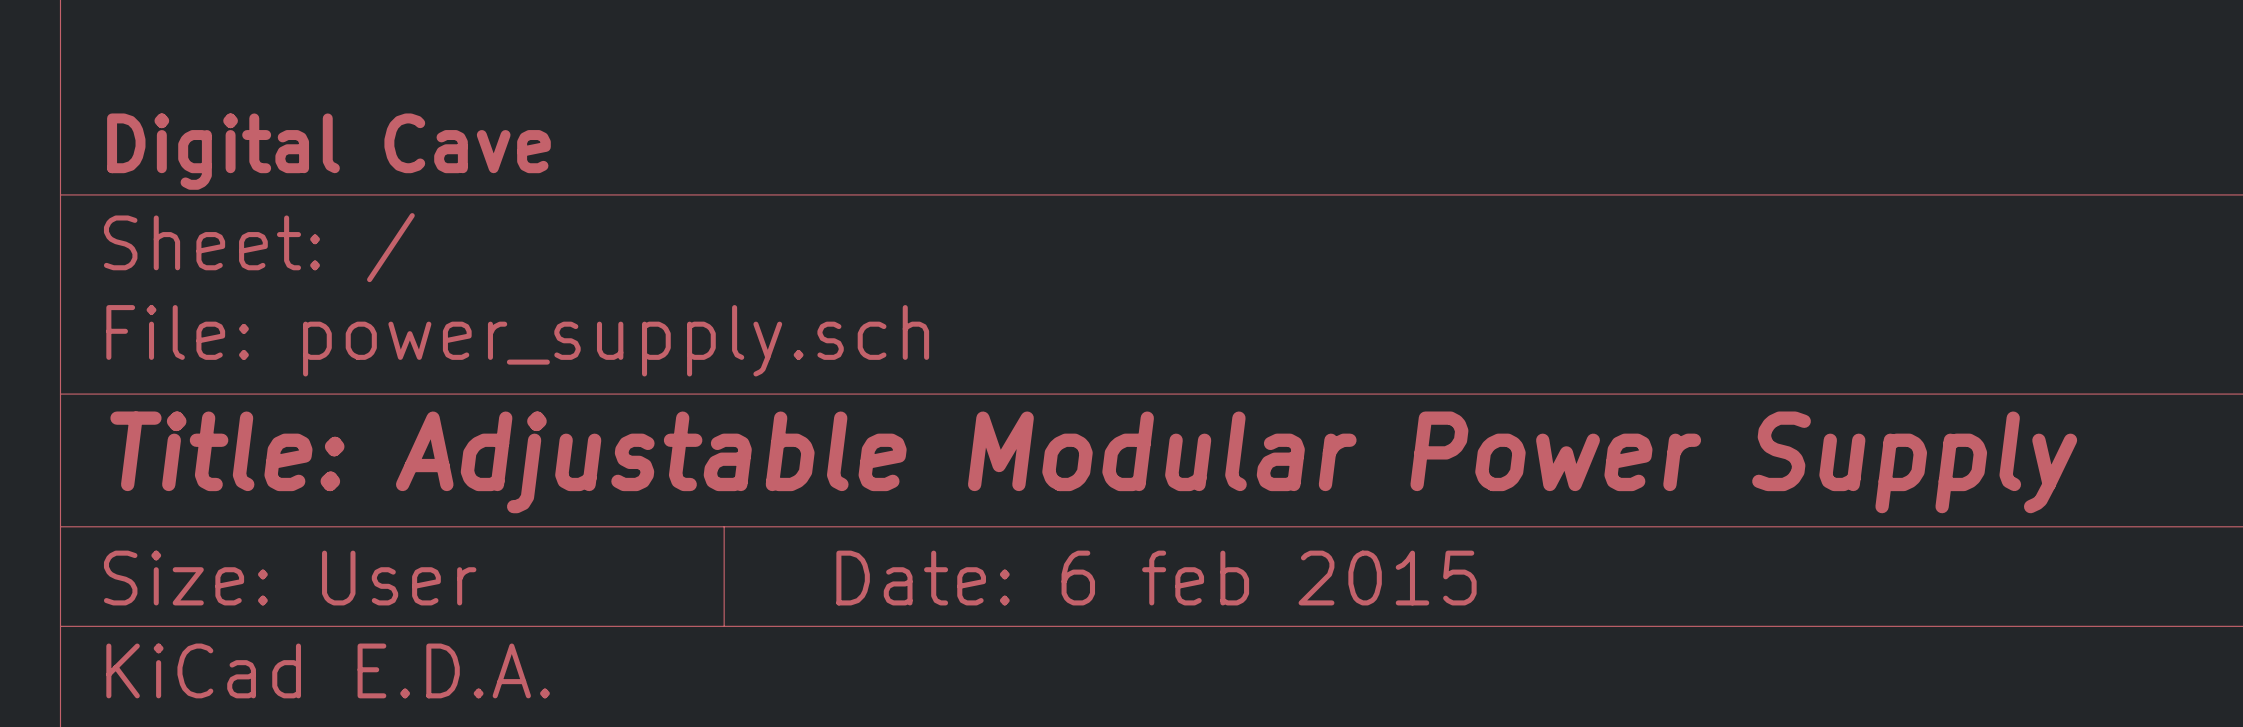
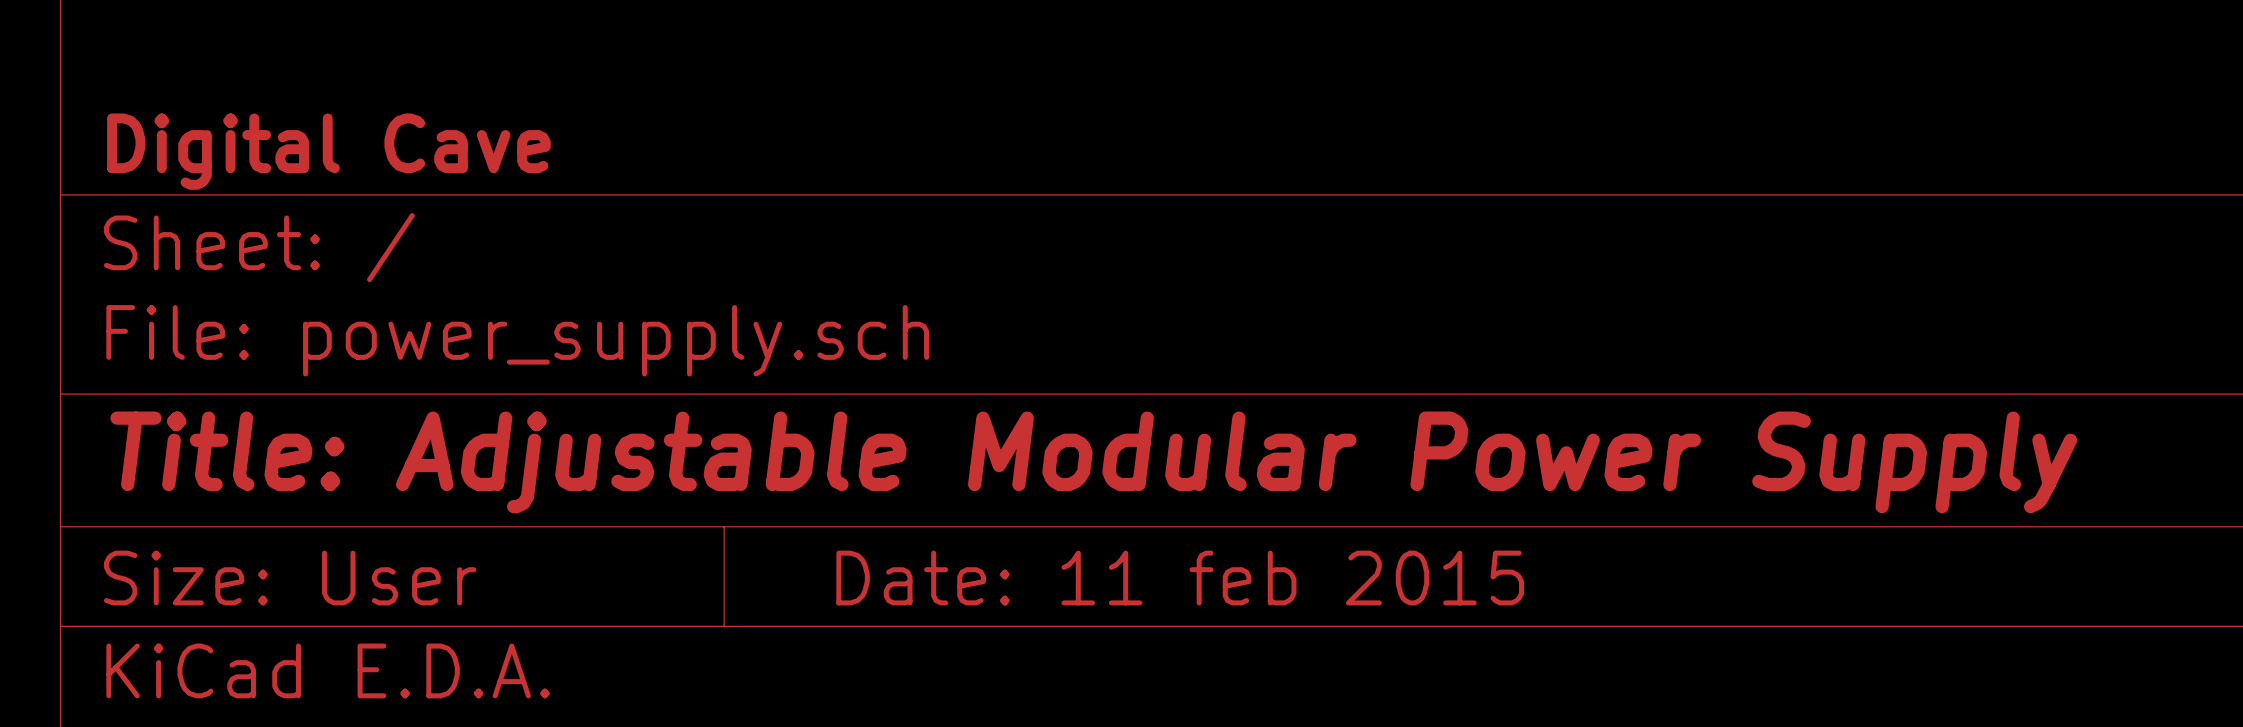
title block: Date: 6 feb 2015 (1156, 578) -> Date: 11 feb 2015 (1180, 578)

